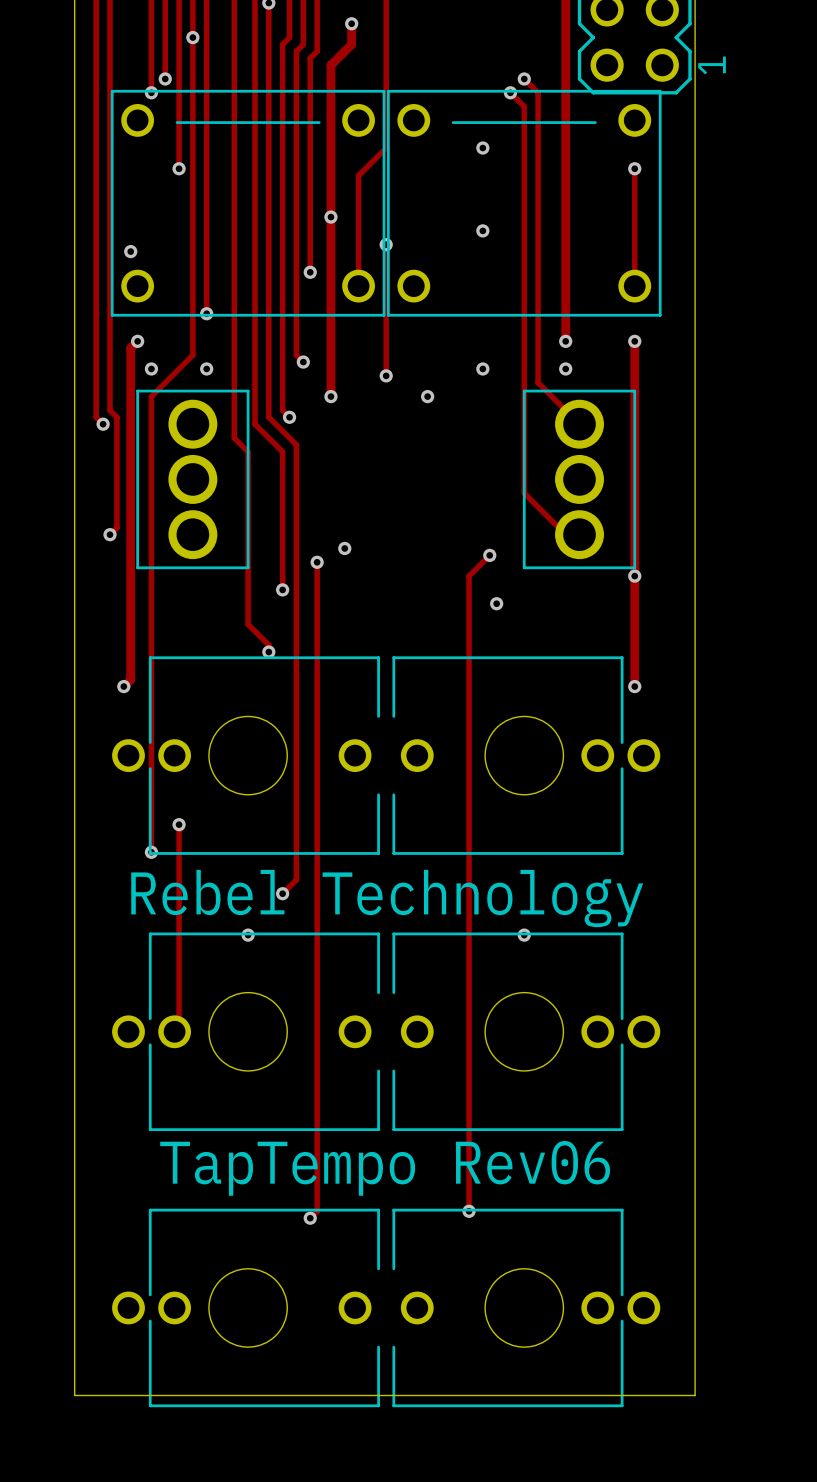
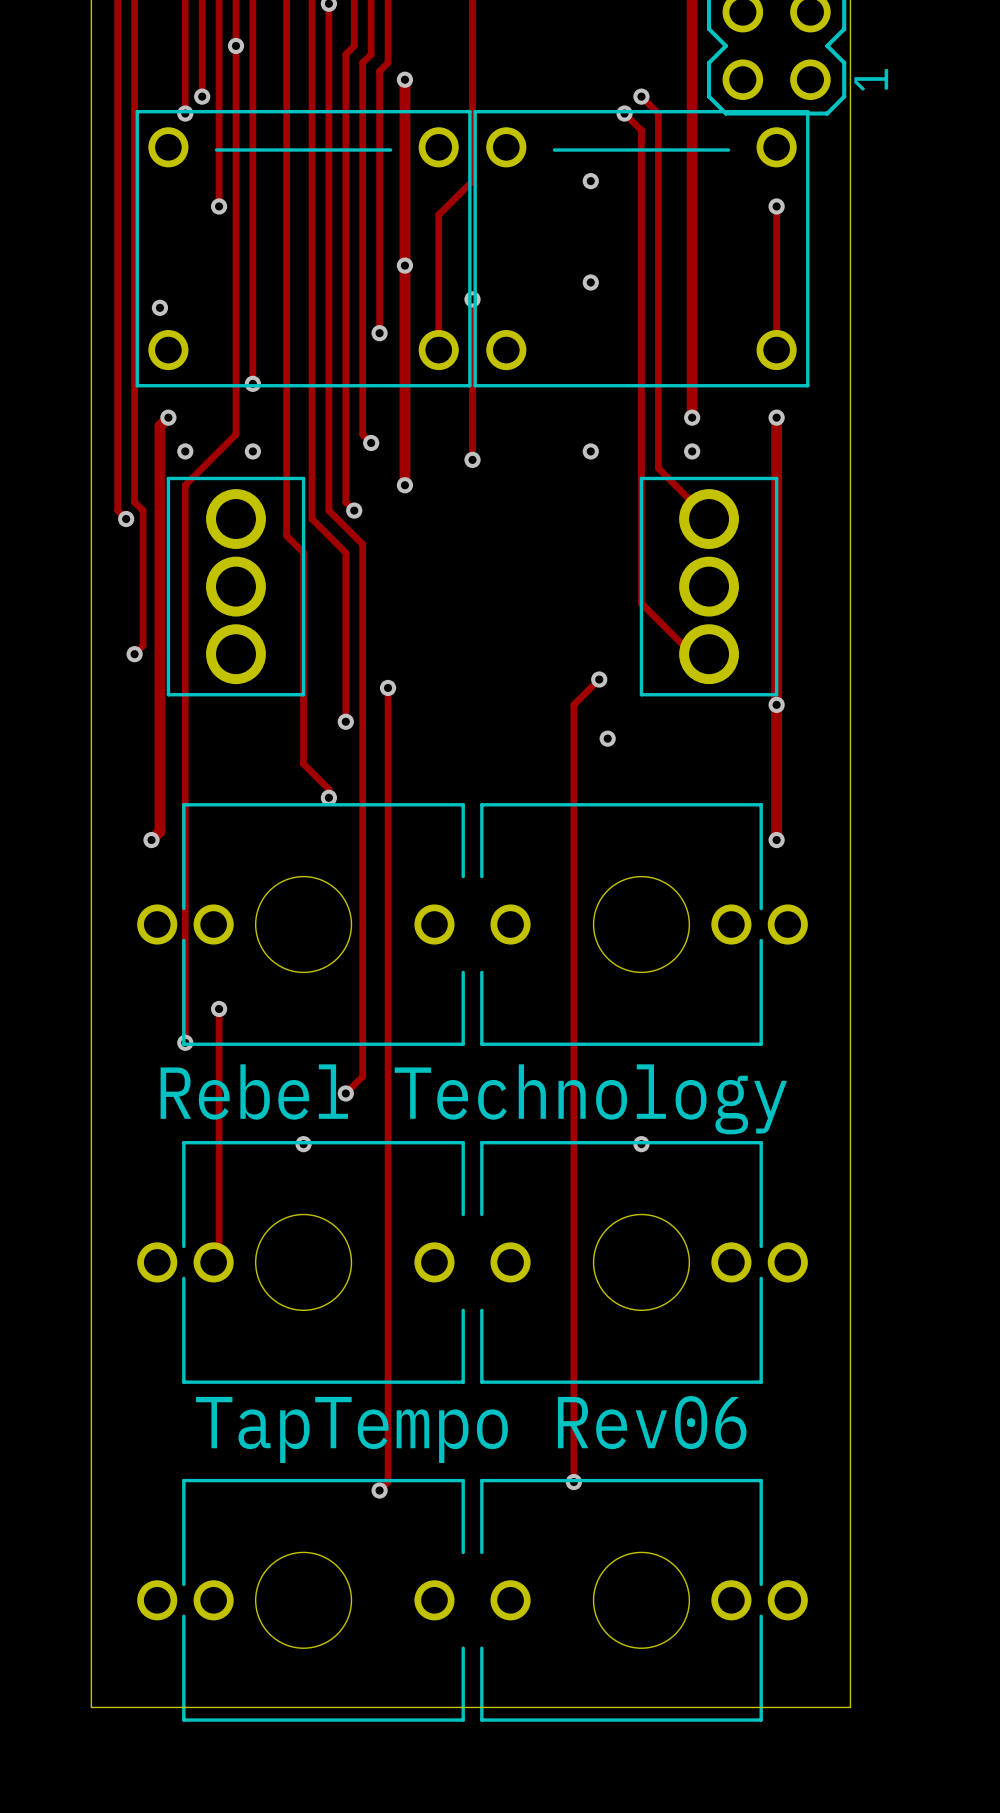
track: (351, 23) (351, 44) (330, 65) -> none
via: (351, 23) -> none
via: none -> (404, 79)
via: (427, 396) -> none
via: (344, 548) -> none

